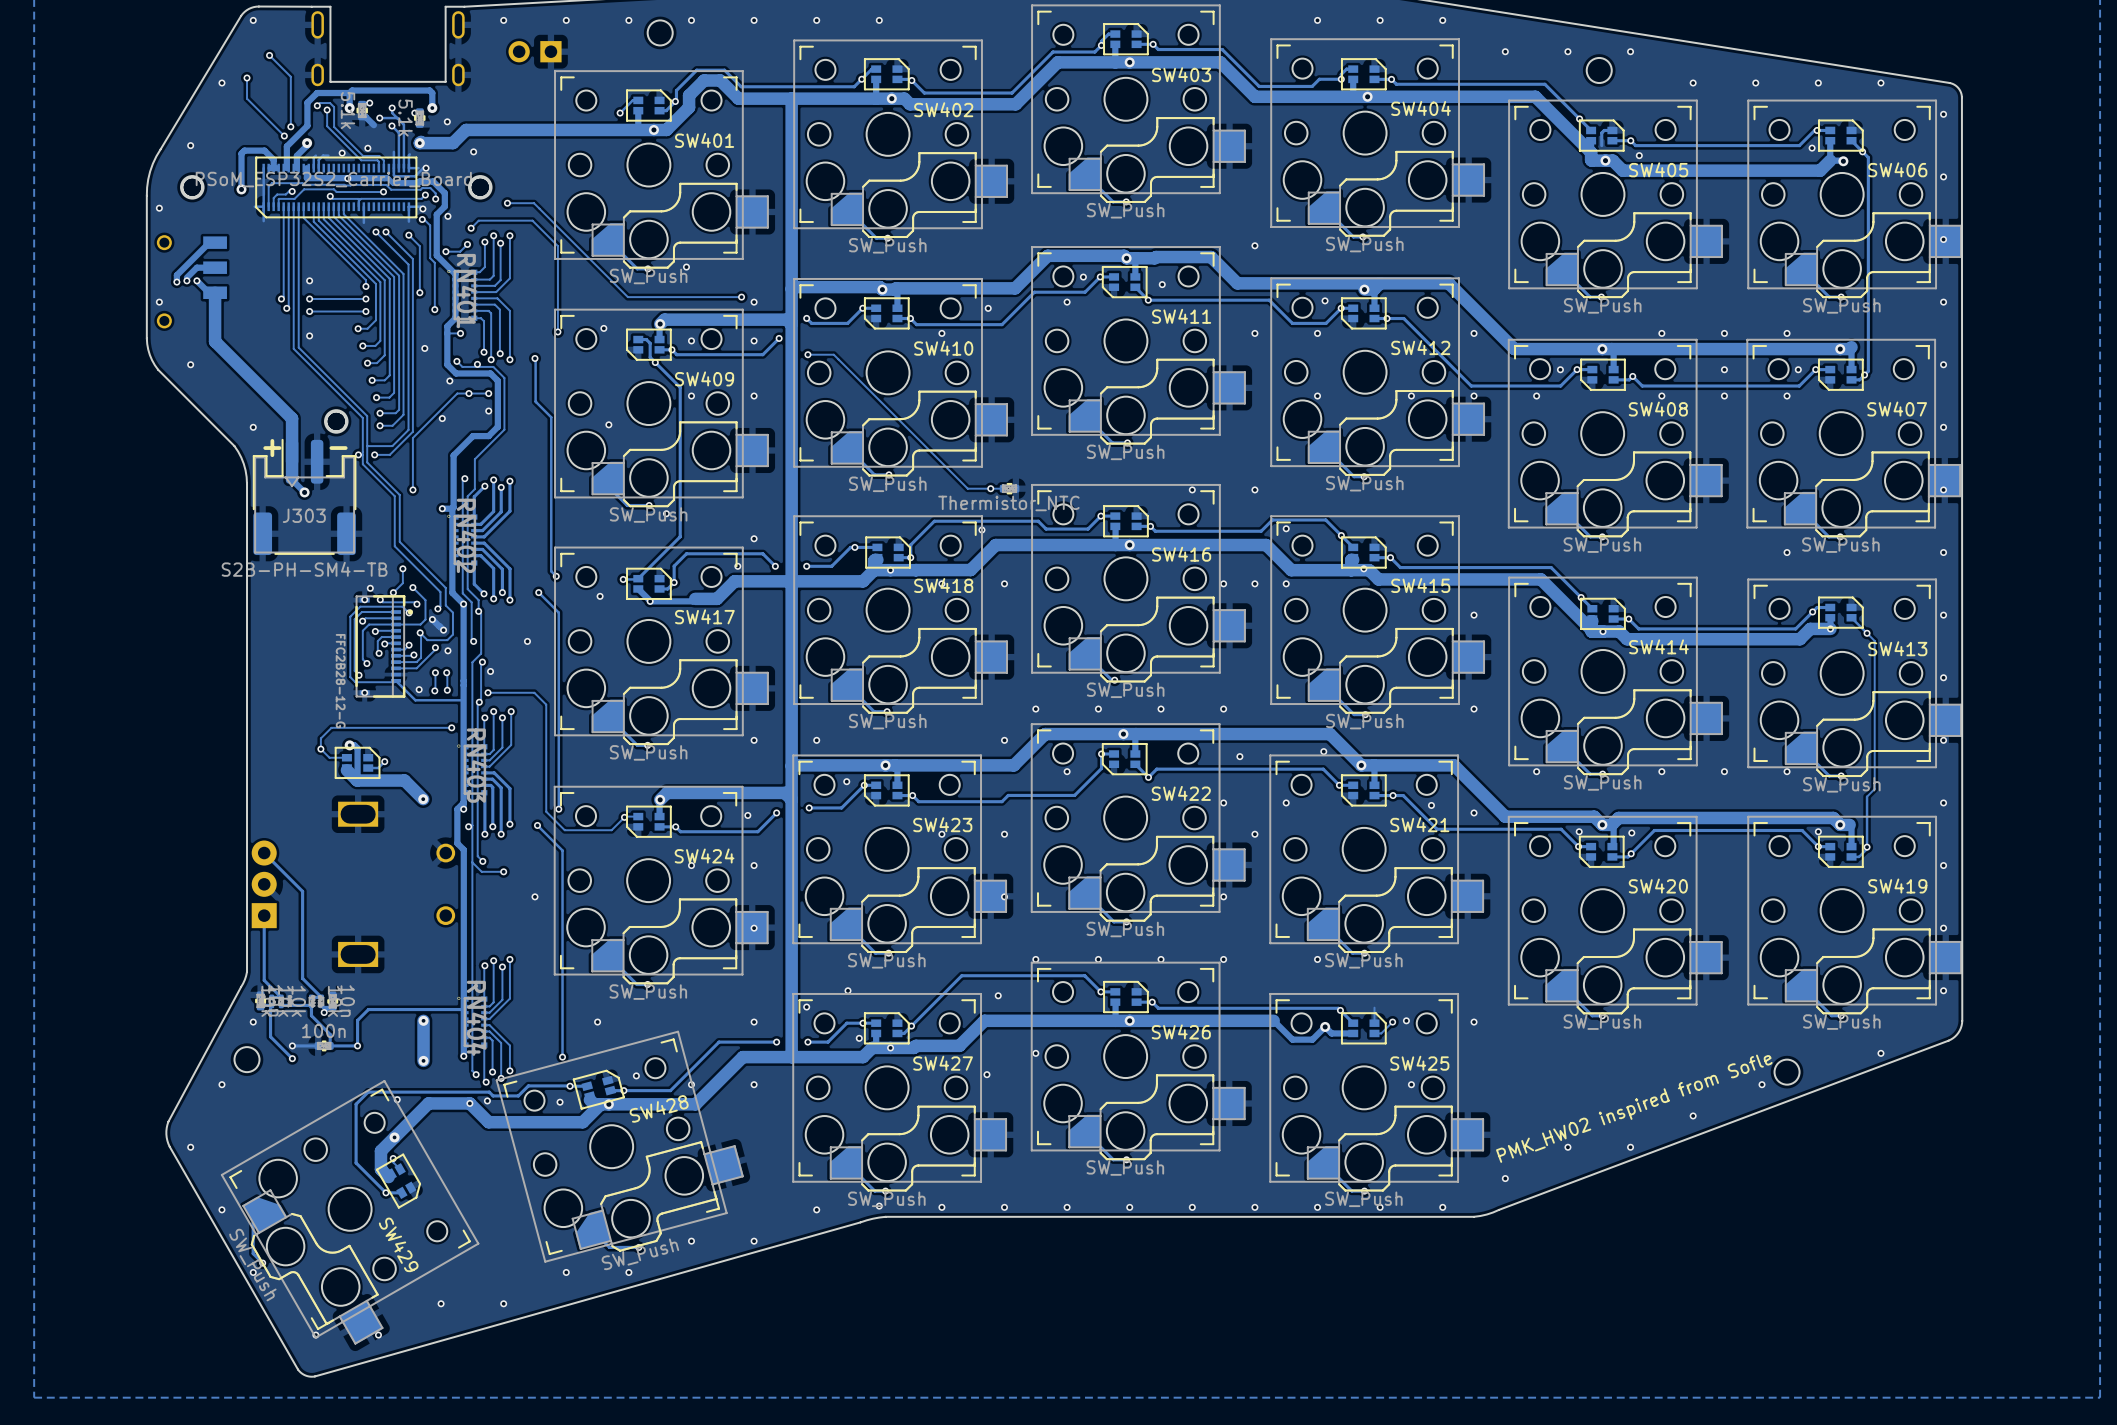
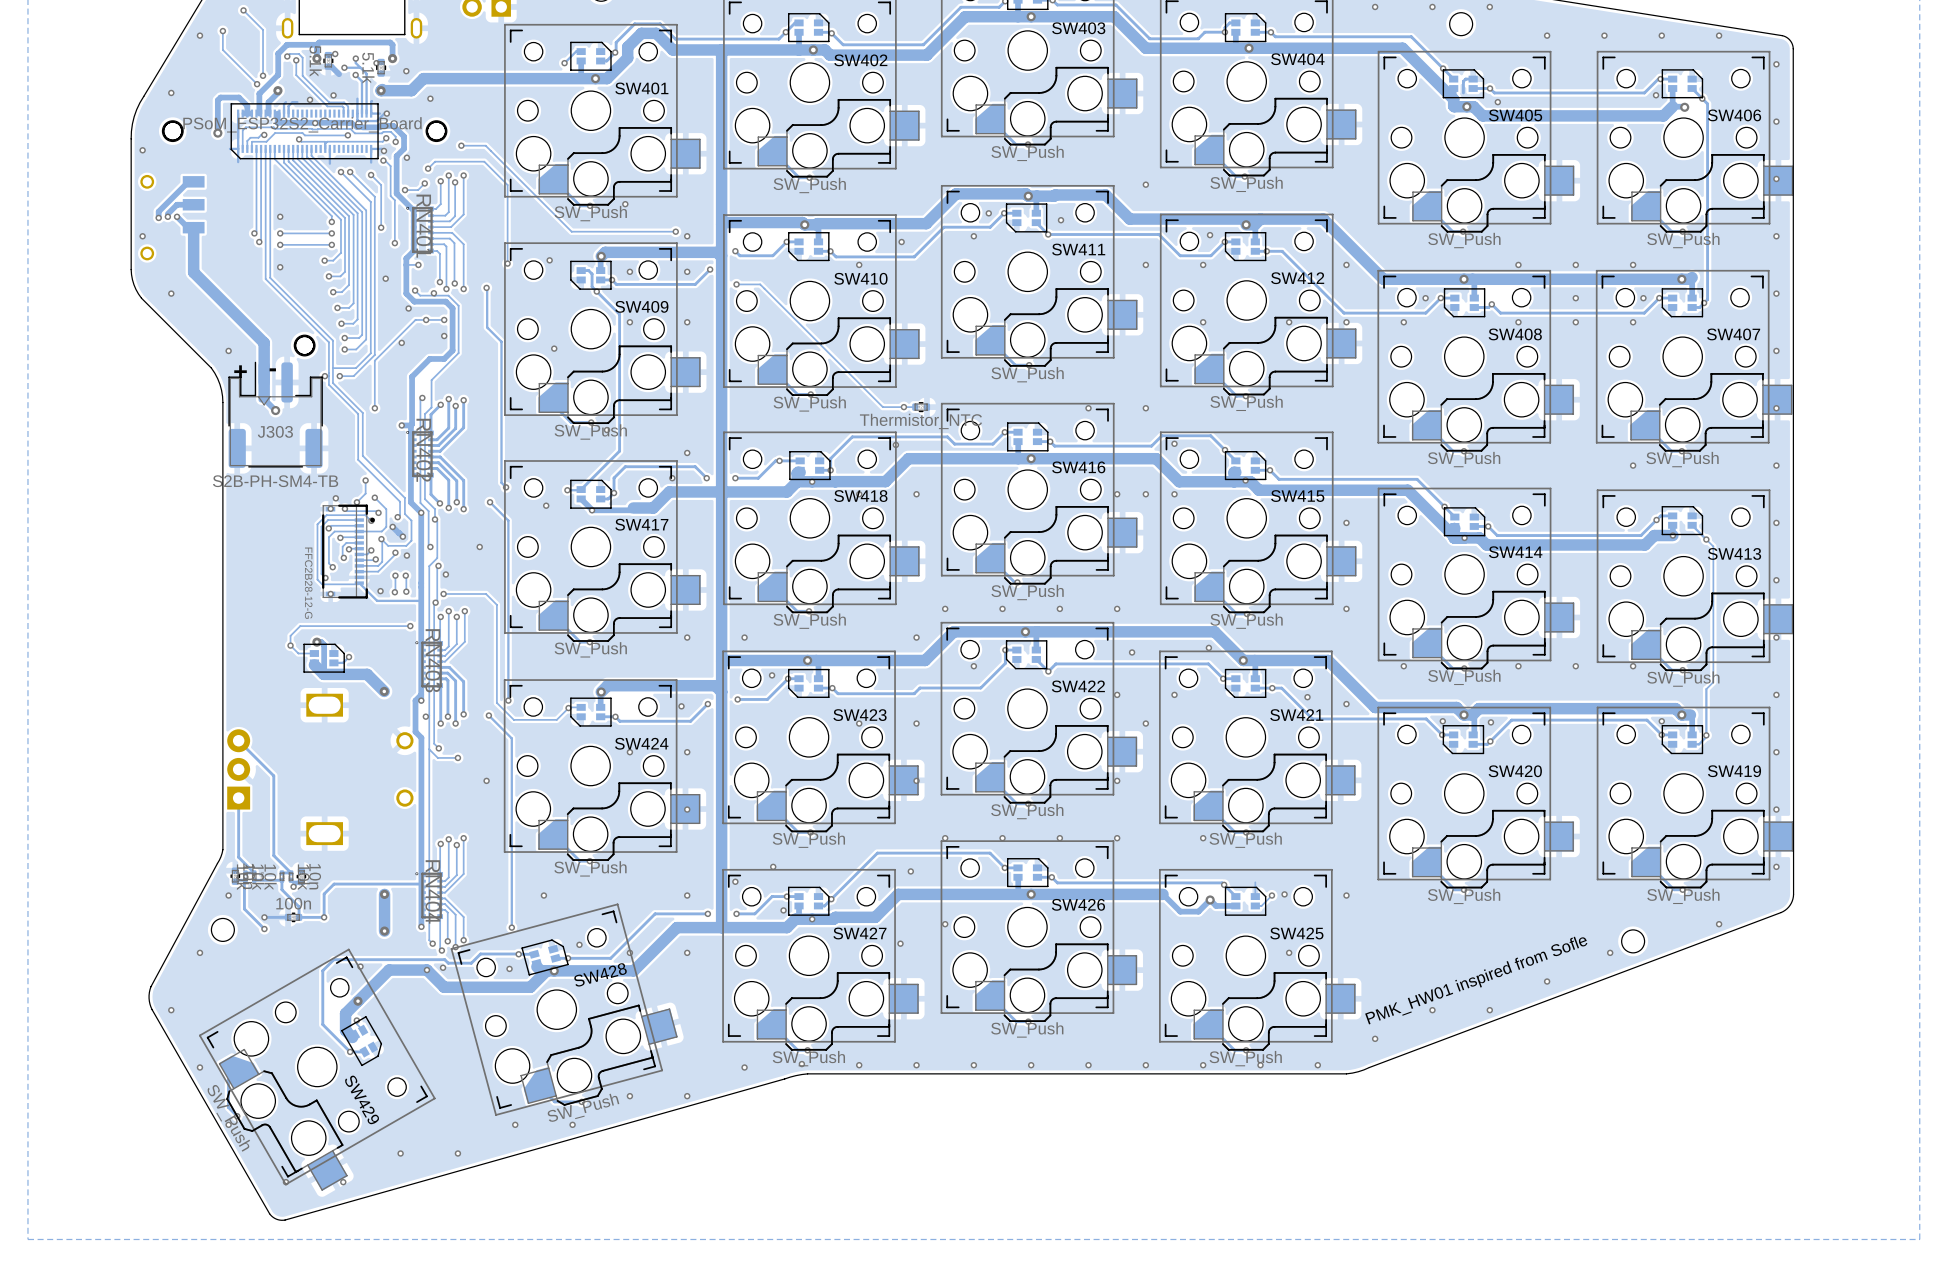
text: PMK_HW02 inspired from Sofle (1634, 1108) -> PMK_HW01 inspired from Sofle (1476, 980)

